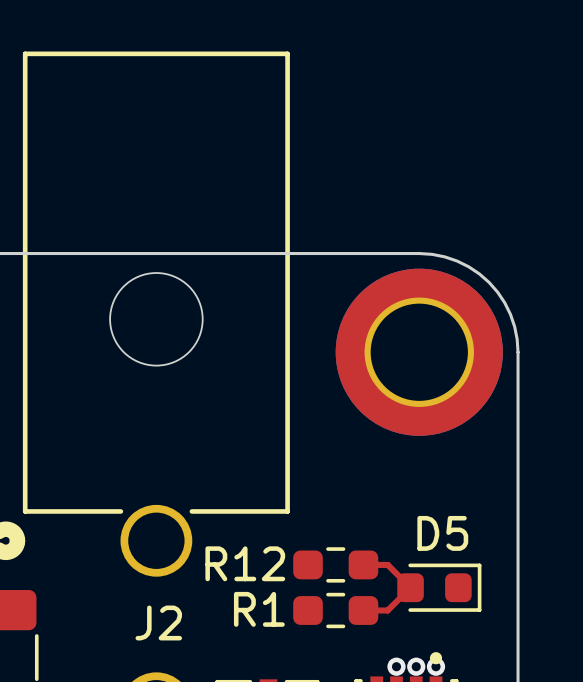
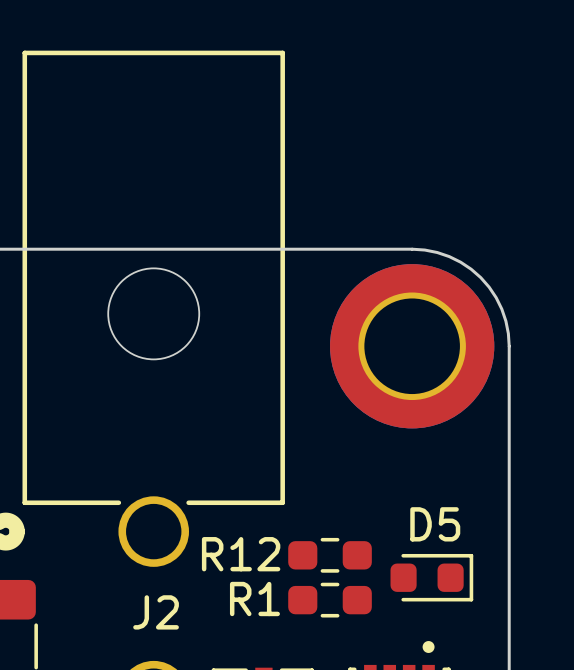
top track: (363, 564) (387, 564) (410, 587) (387, 610) (363, 610) -> none
via: (396, 666) -> none
via: (416, 666) -> none
via: (435, 666) -> none

